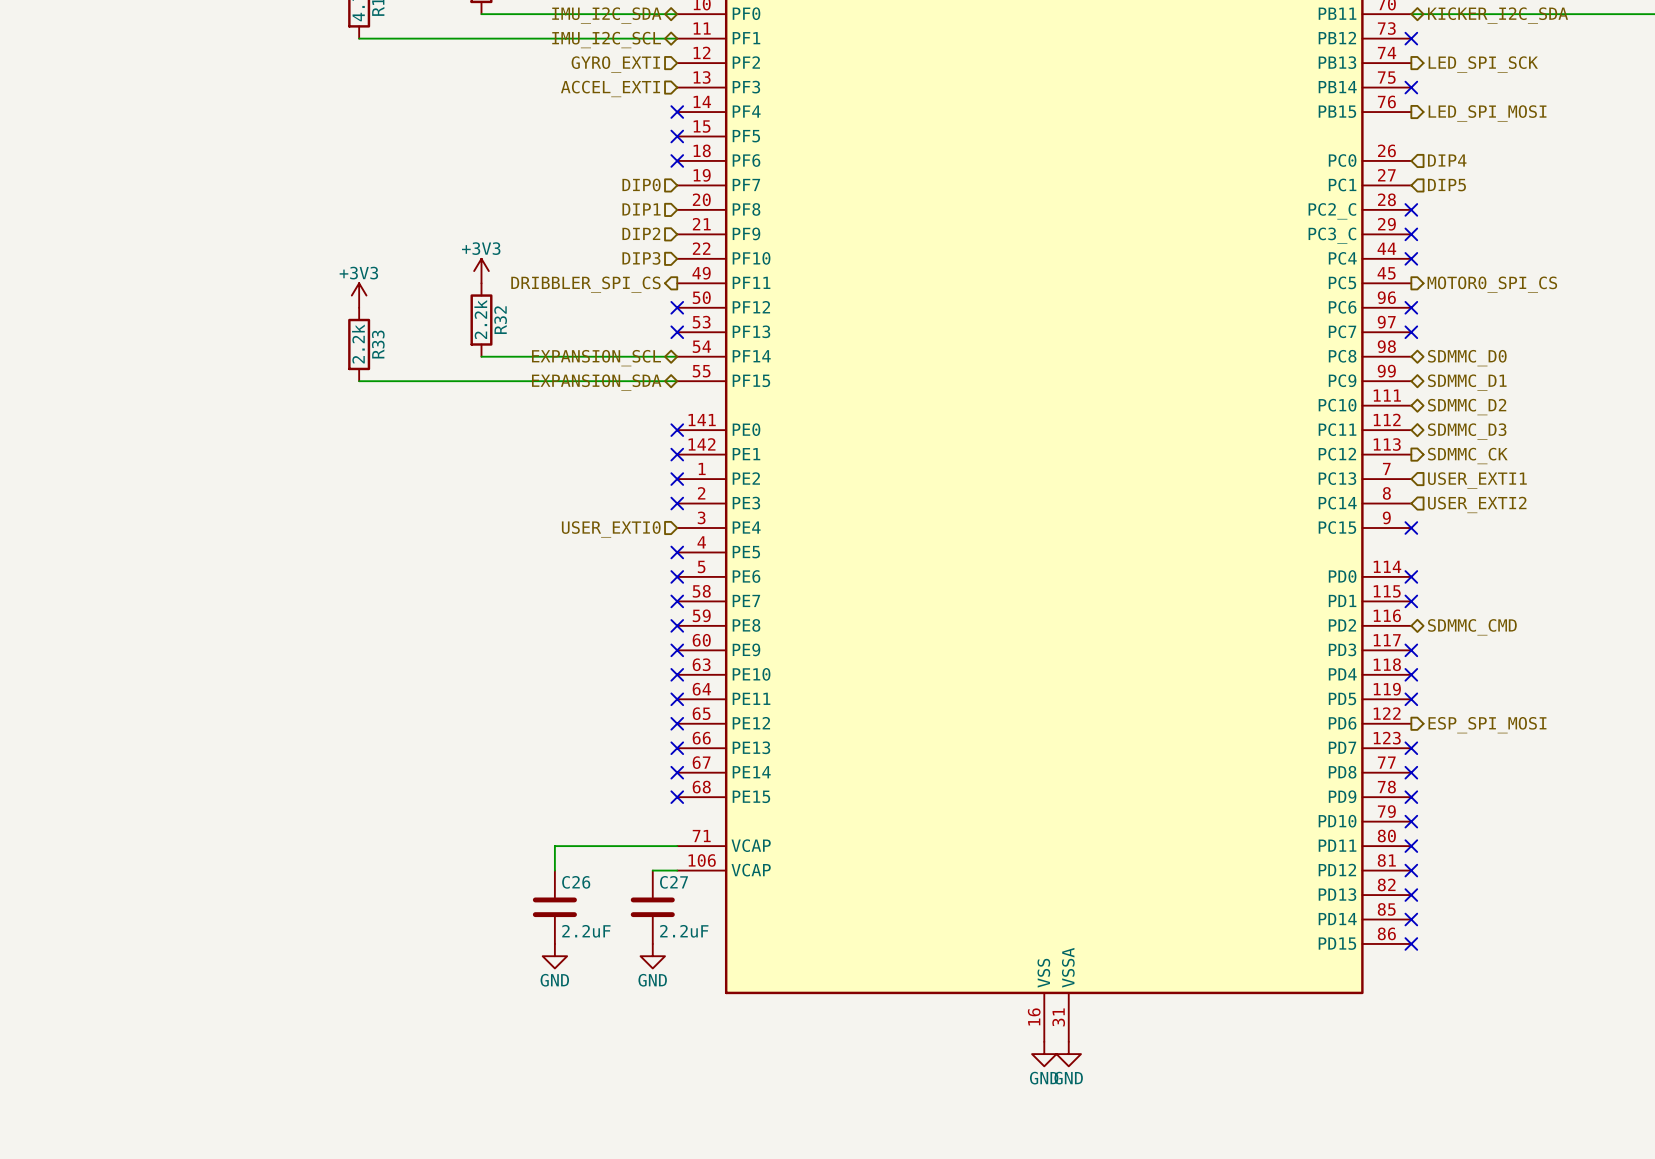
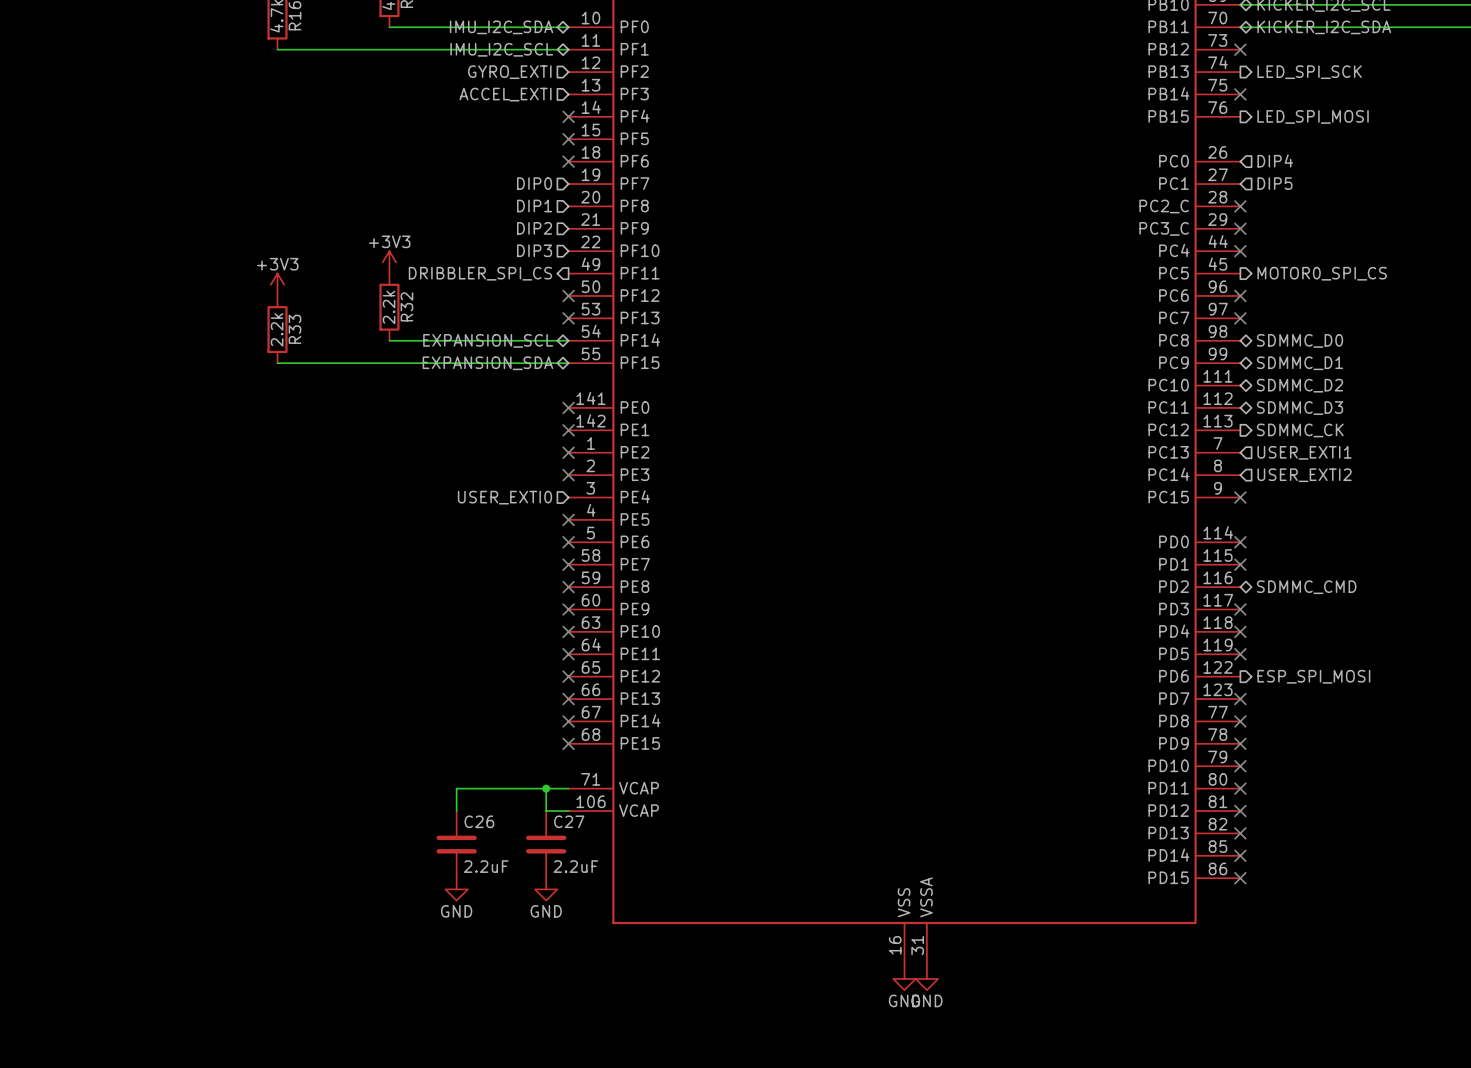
wire: none -> (546, 788) (546, 811)
junction: none -> (546, 788)

